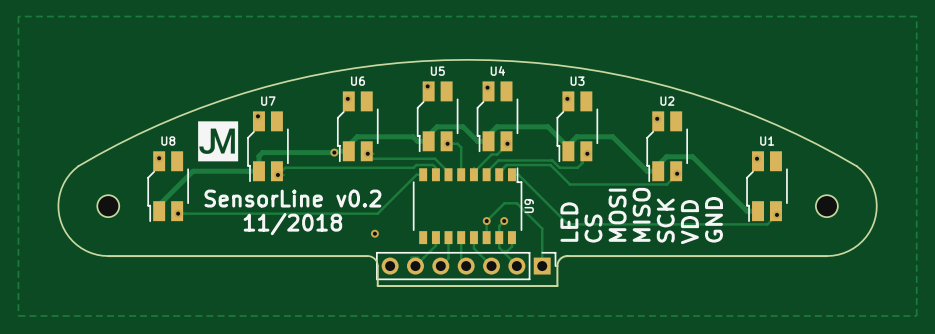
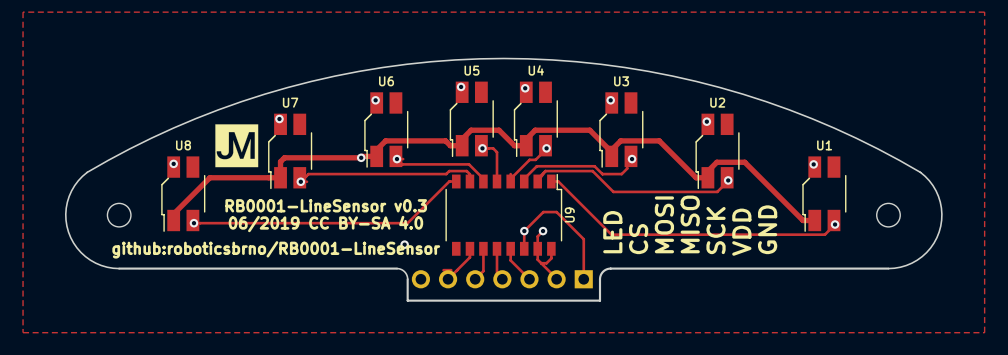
text: none -> RB0001-LineSensor v0.3 (326, 205)
text: SensorLine v0.2 (292, 198) -> none
text: none -> 06/2019 CC BY-SA 4.0 (325, 224)
text: 11/2018 (292, 224) -> none
text: none -> github:roboticsbrno/RB0001-LineSensor (276, 249)
part side: top (466, 266) -> bottom (502, 279)

